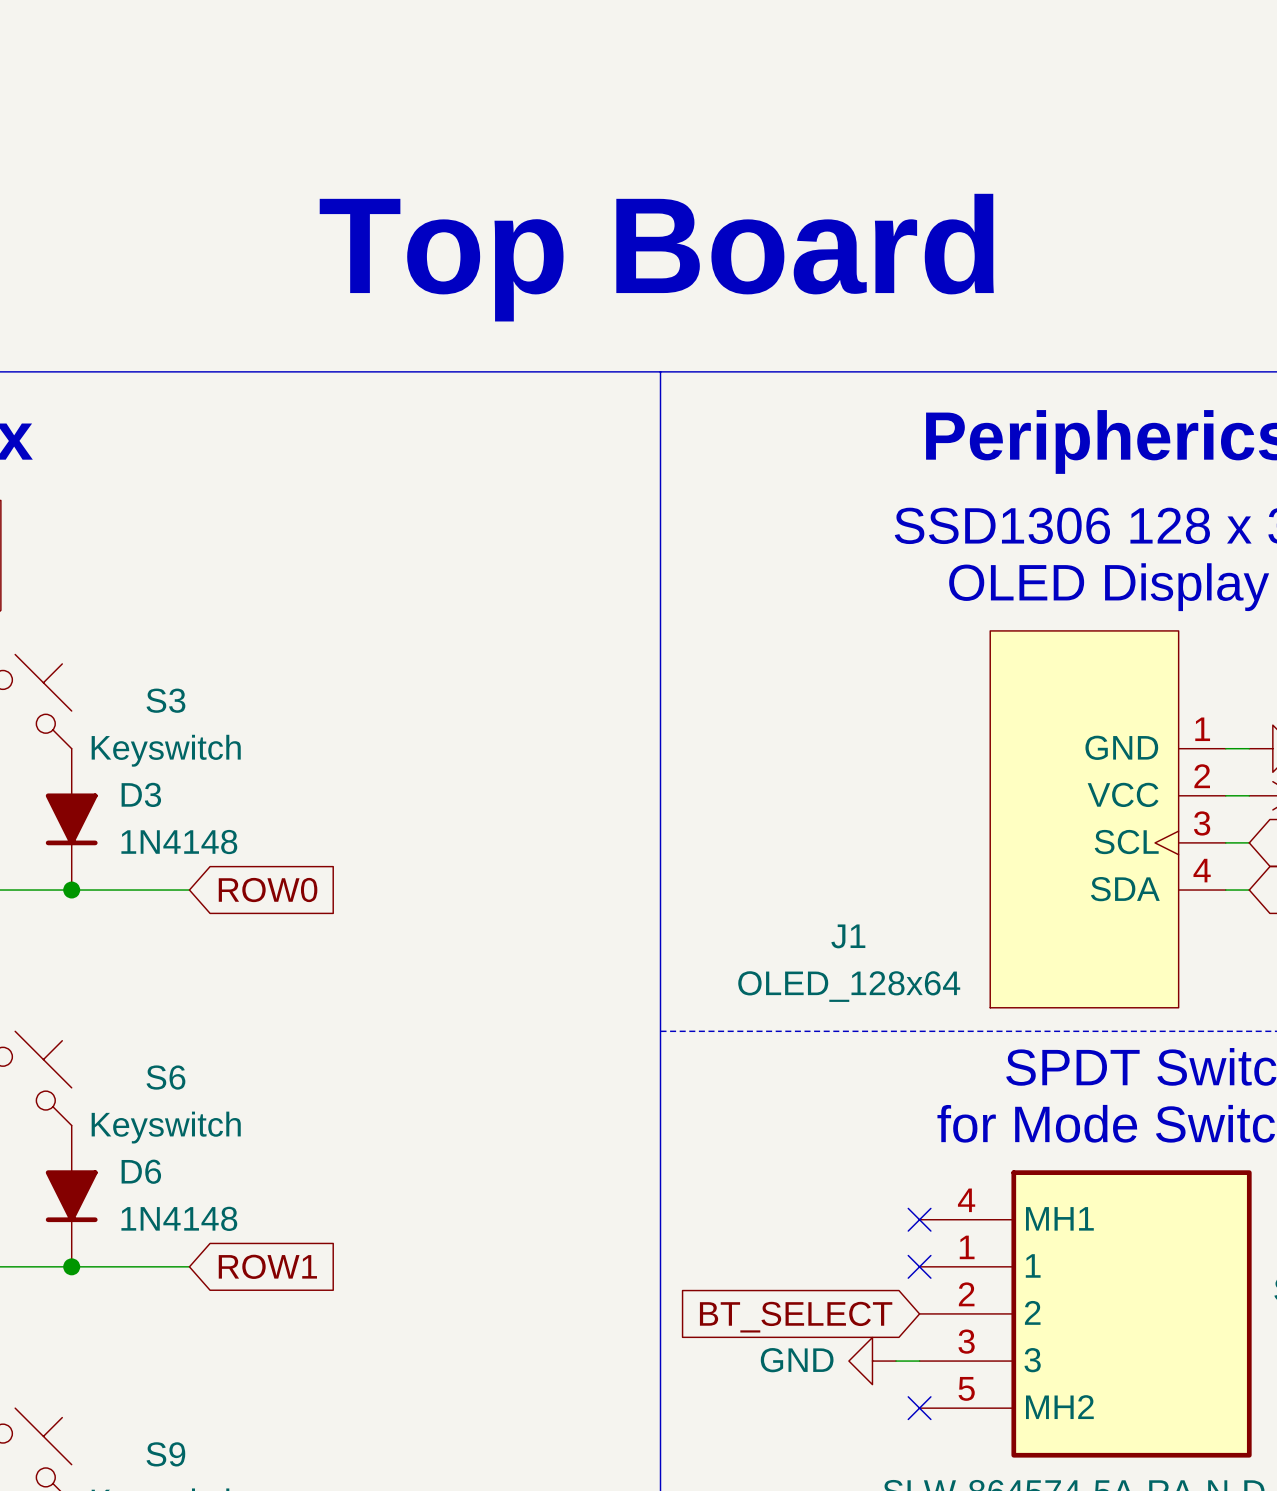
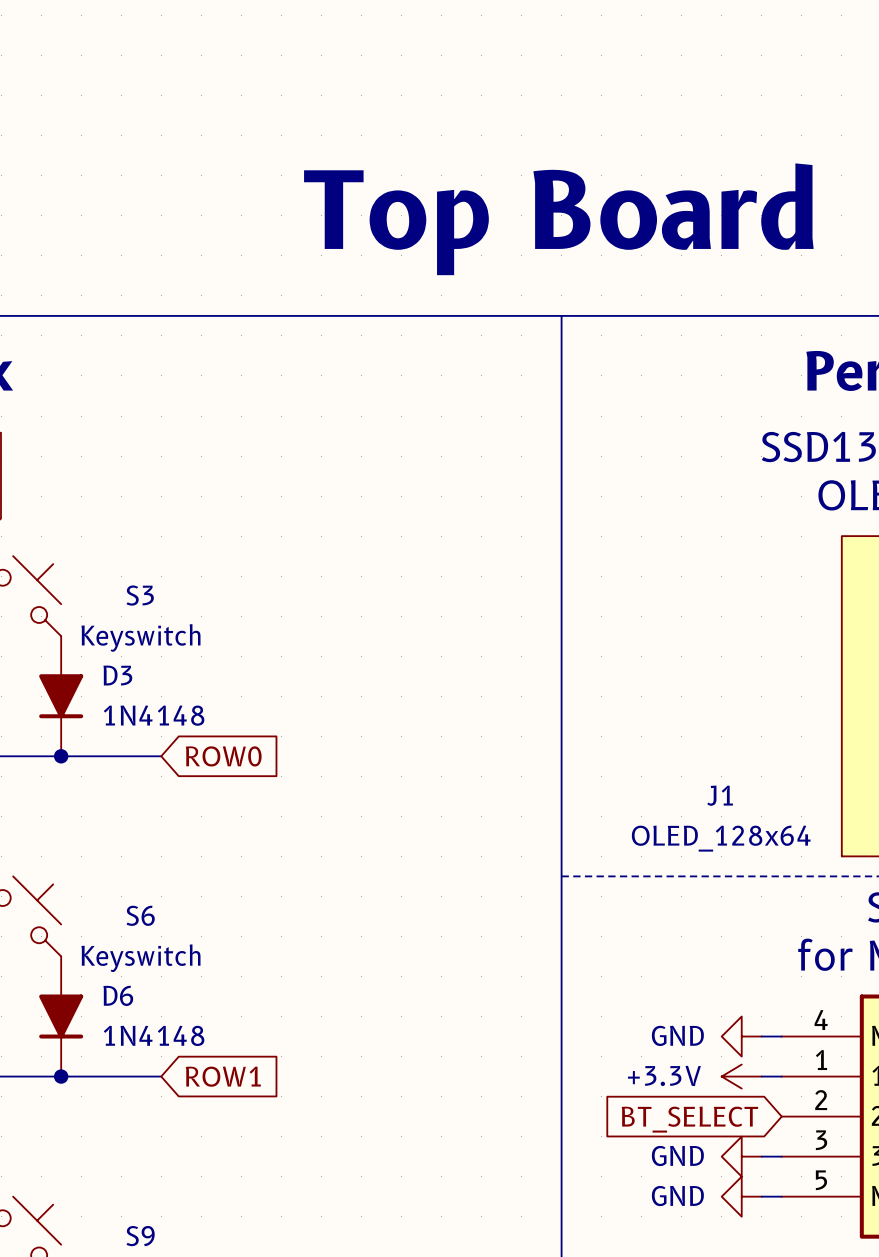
power symbol: none -> GND (741, 1036)
wire: none -> (761, 1036) (781, 1036)
no-connect mark: (919, 1219) -> none
power symbol: none -> +3.3V (741, 1076)
wire: none -> (761, 1076) (781, 1076)
no-connect mark: (919, 1266) -> none
power symbol: none -> GND (741, 1196)
wire: none -> (761, 1196) (781, 1196)
no-connect mark: (919, 1408) -> none

